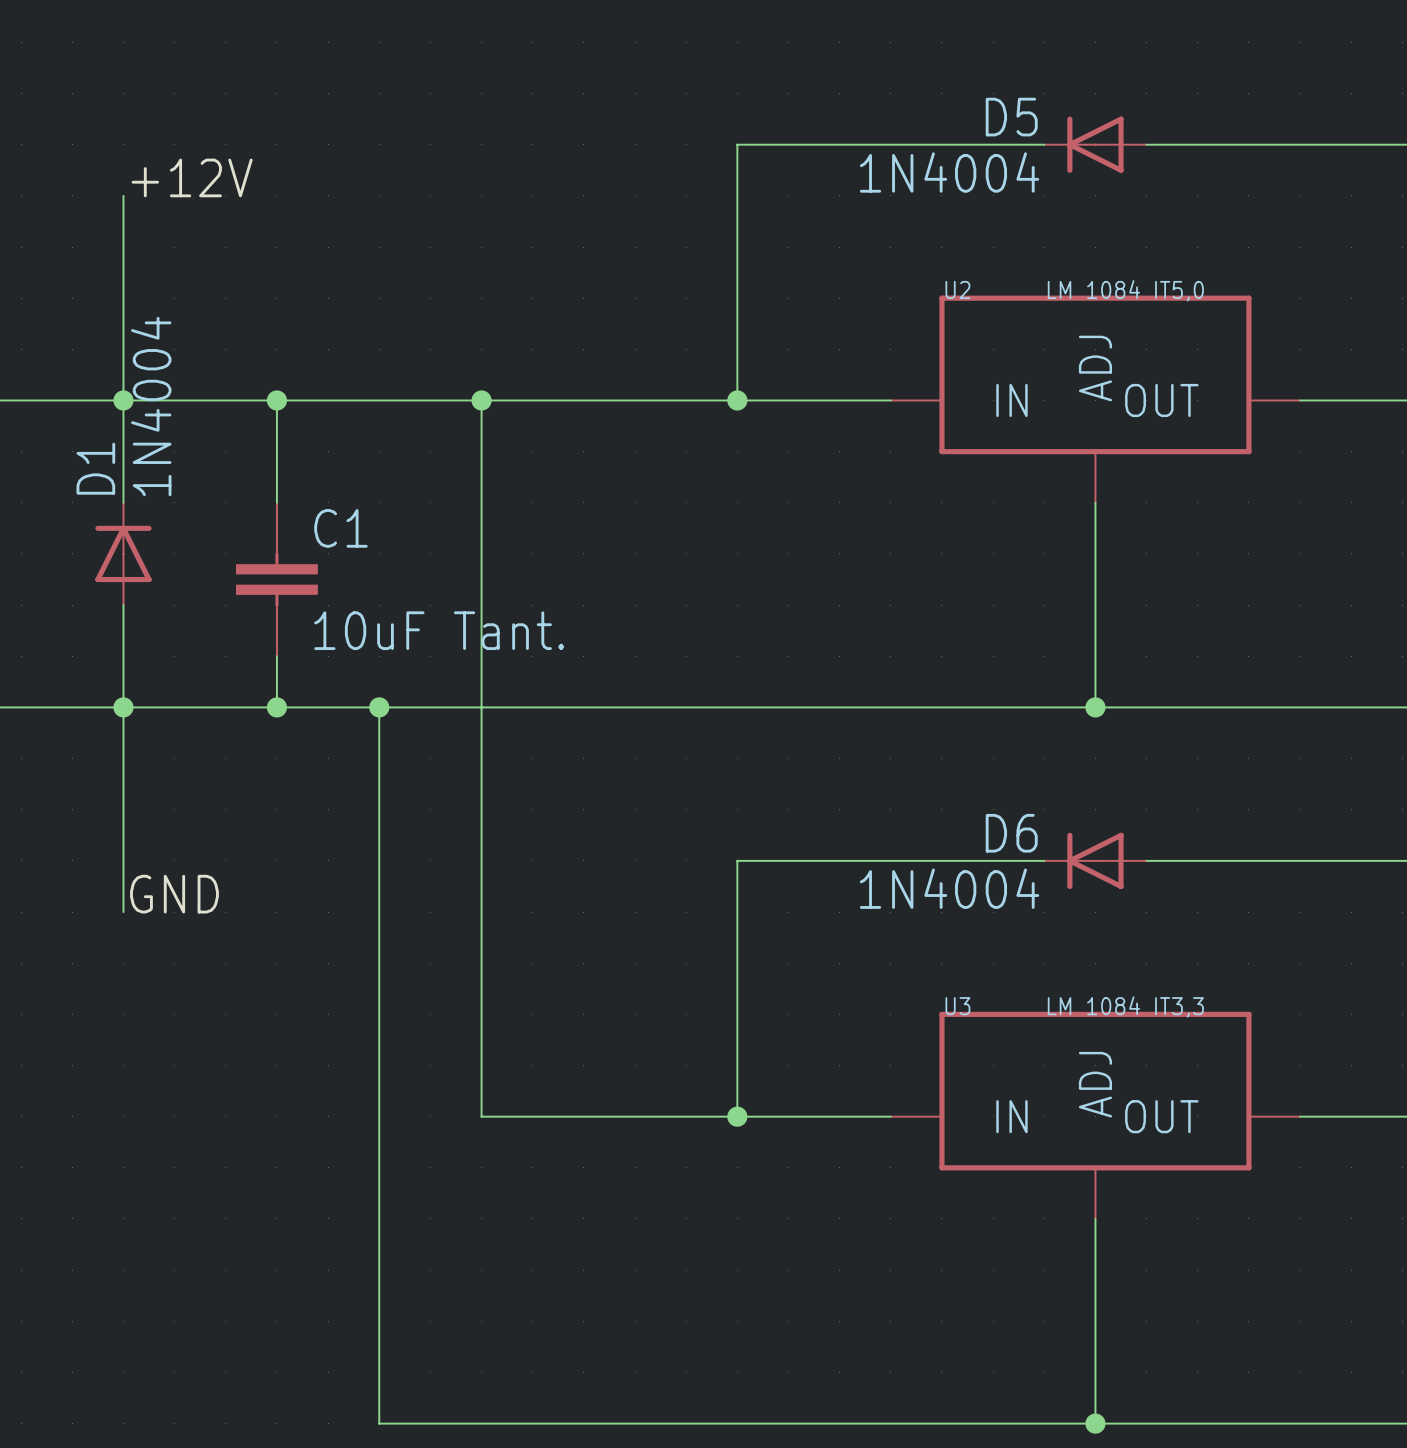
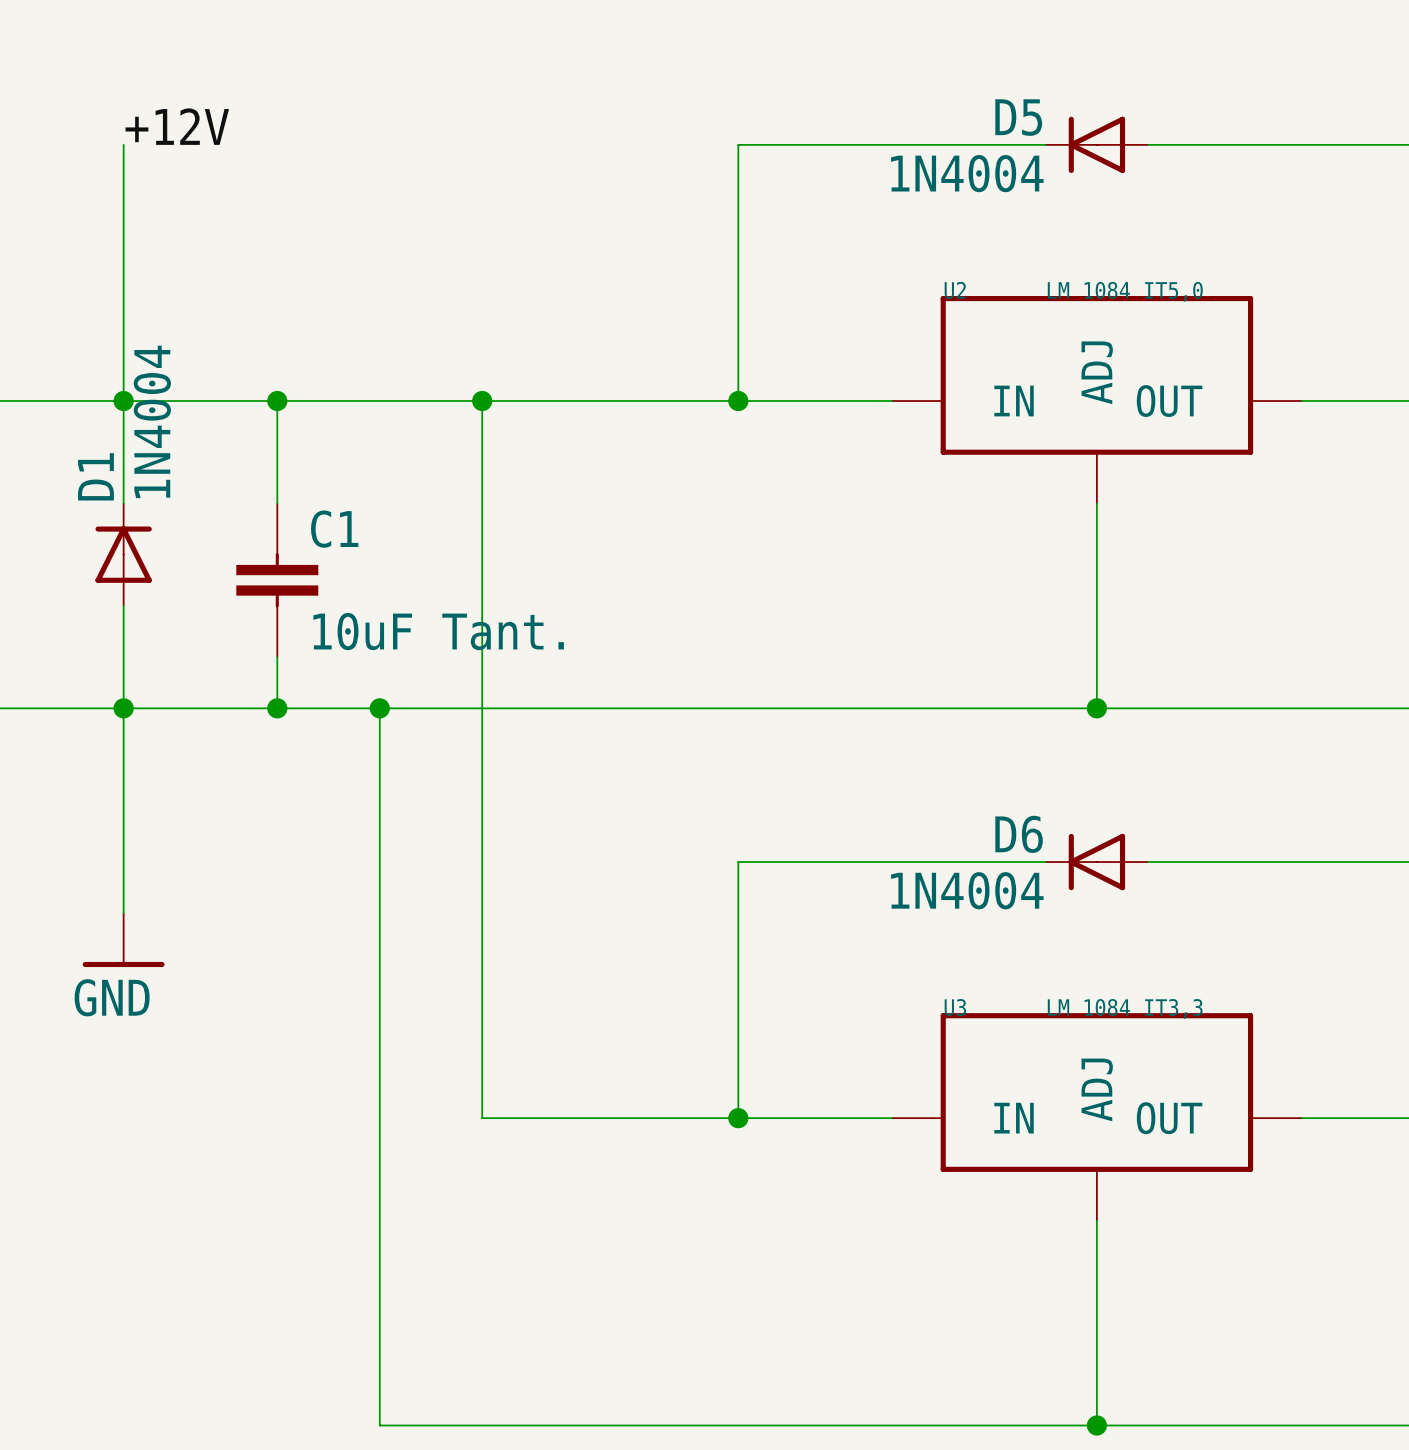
wire: none -> (123, 144) (123, 196)
label position: +12V (192, 177) -> +12V (177, 126)
label: GND (174, 894) -> none
power symbol: none -> GND (123, 940)

